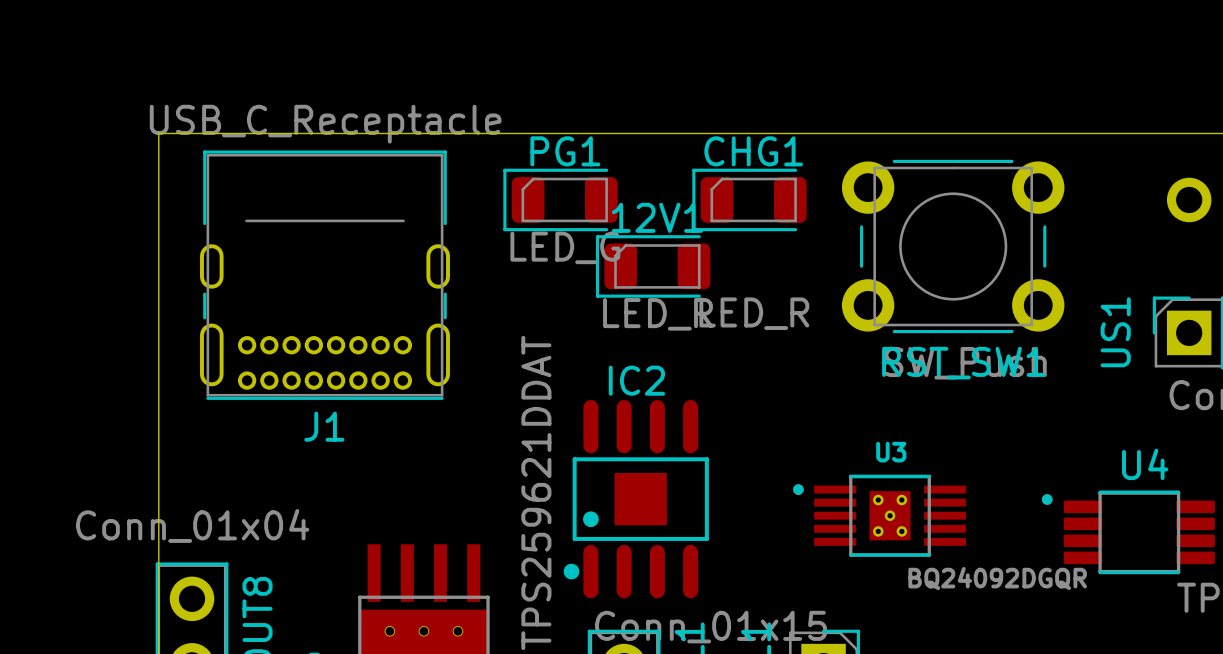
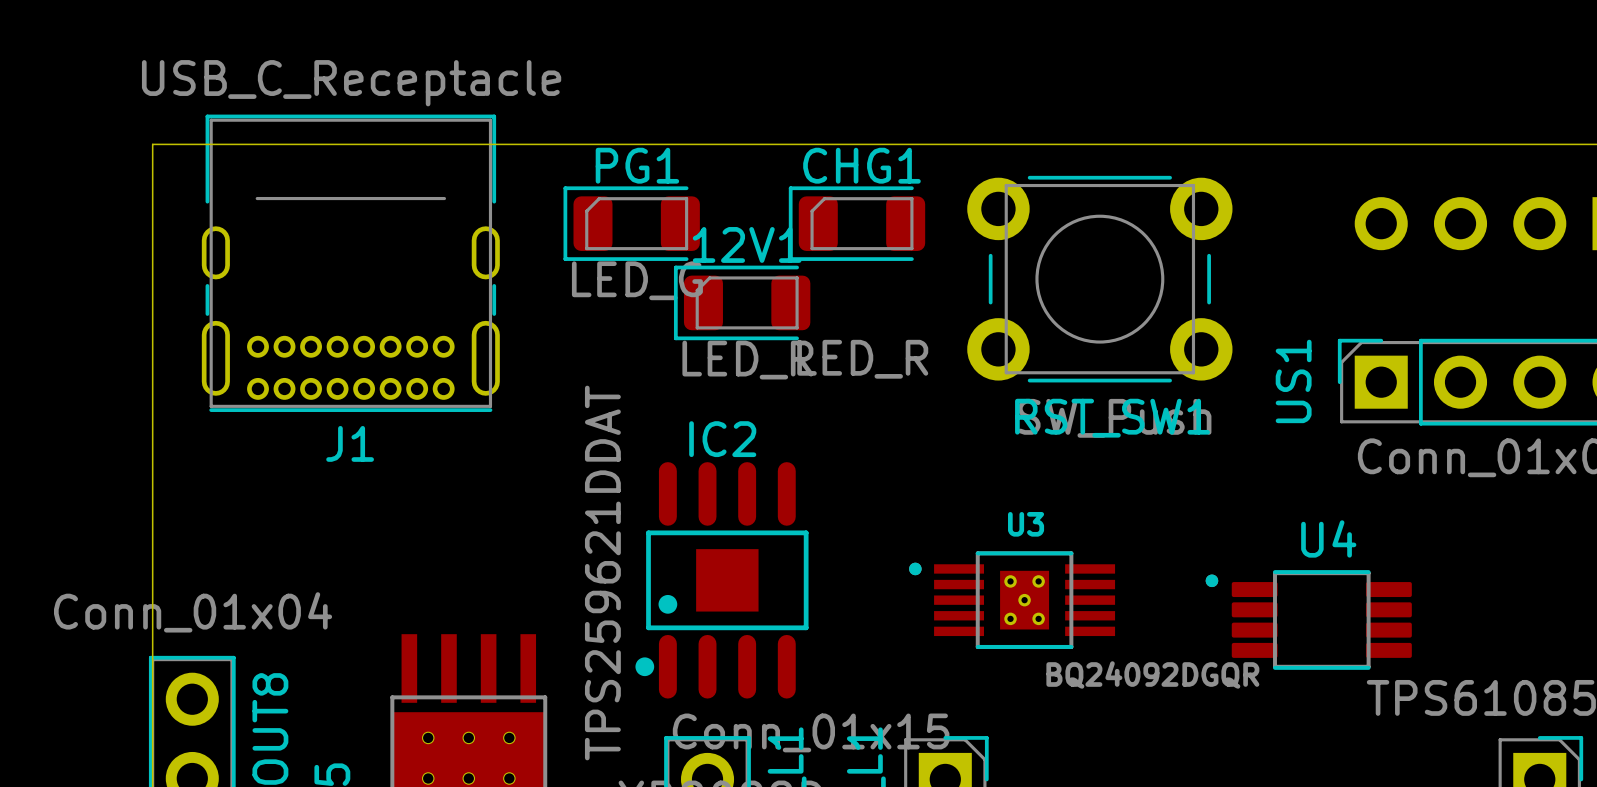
J1 position: (324, 275) -> (350, 263)

